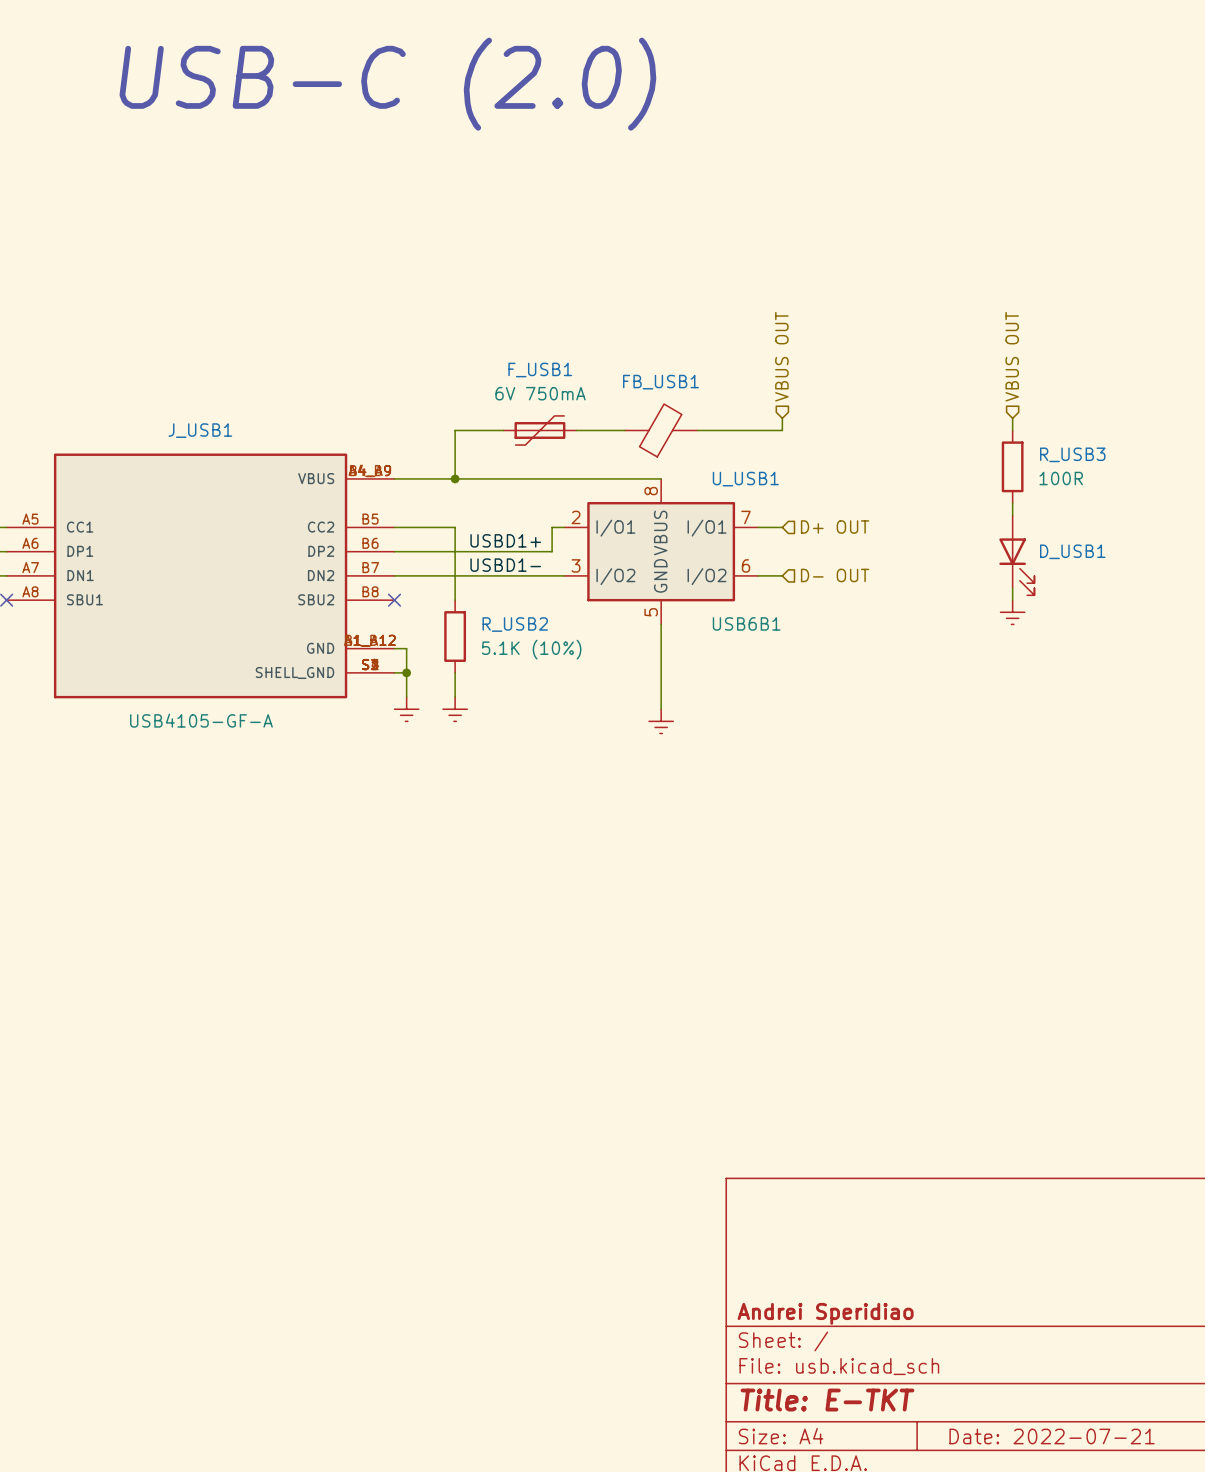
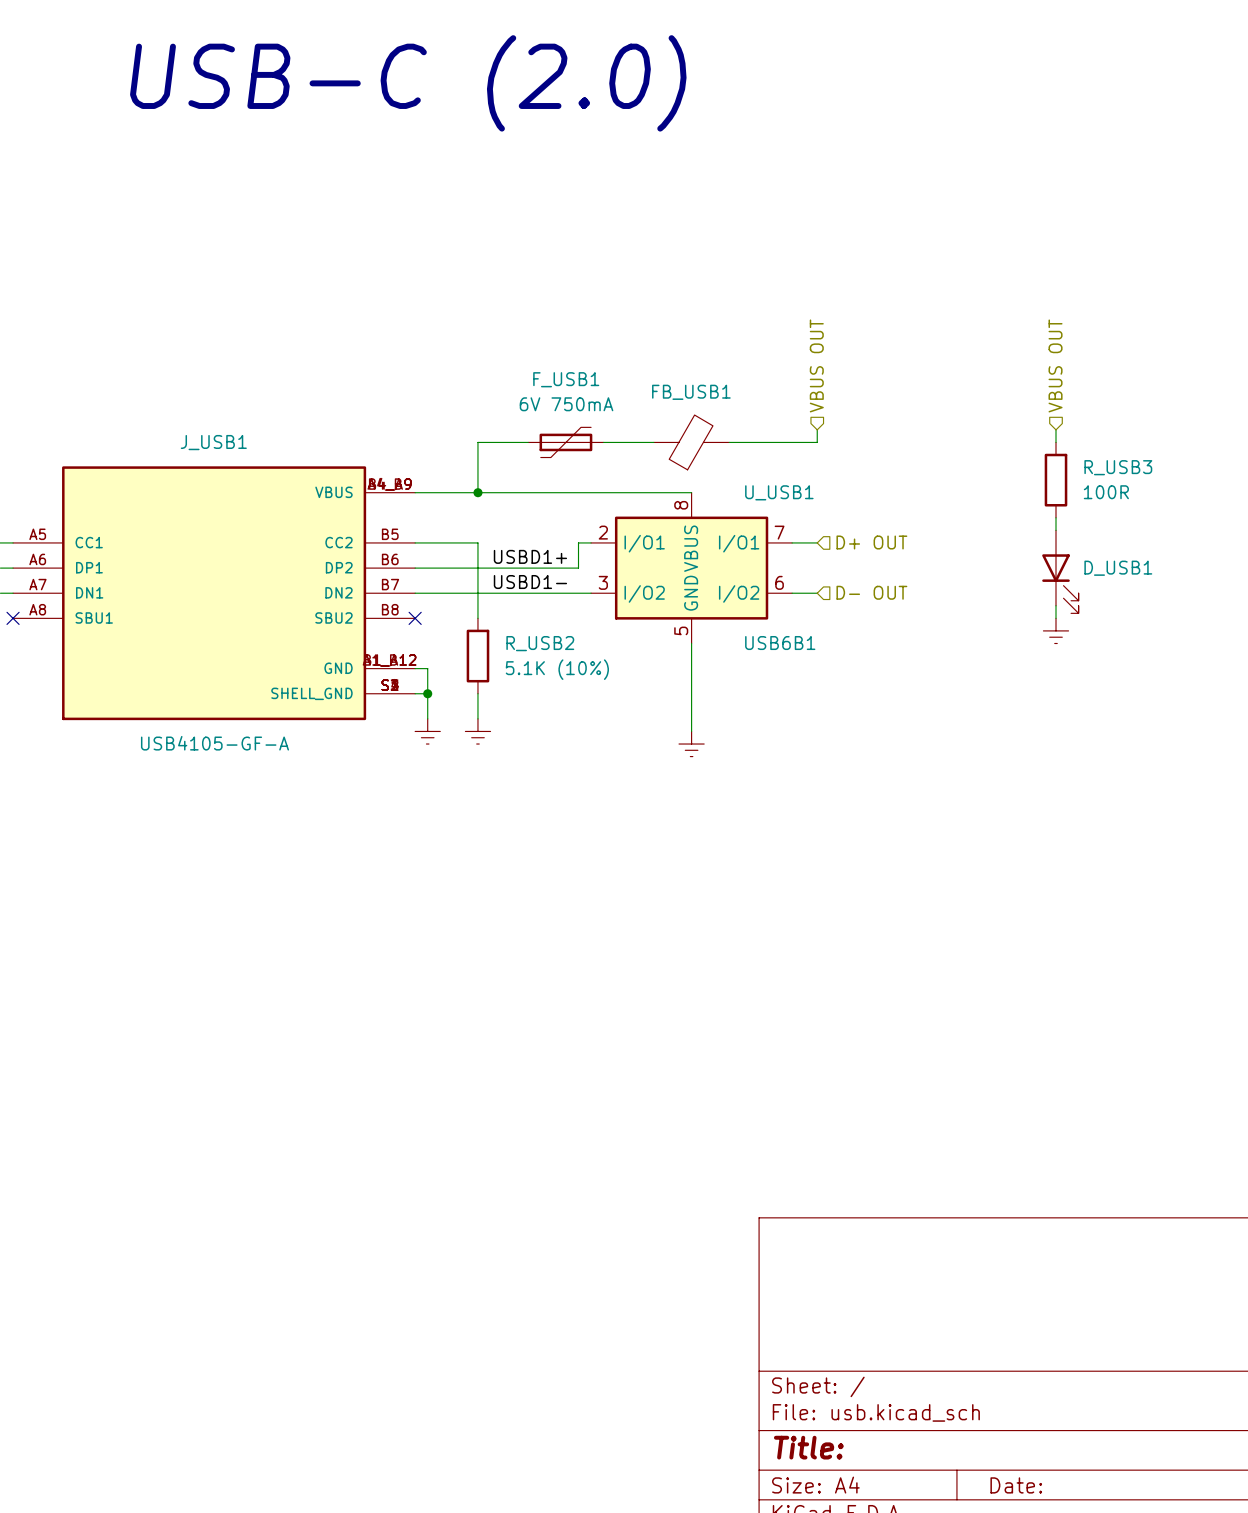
title block: Andrei Speridiao (825, 1313) -> none
title block: Title: E-TKT (827, 1400) -> Title: (808, 1447)
title block: Date: 2022-07-21 (1052, 1436) -> Date: (1016, 1485)

